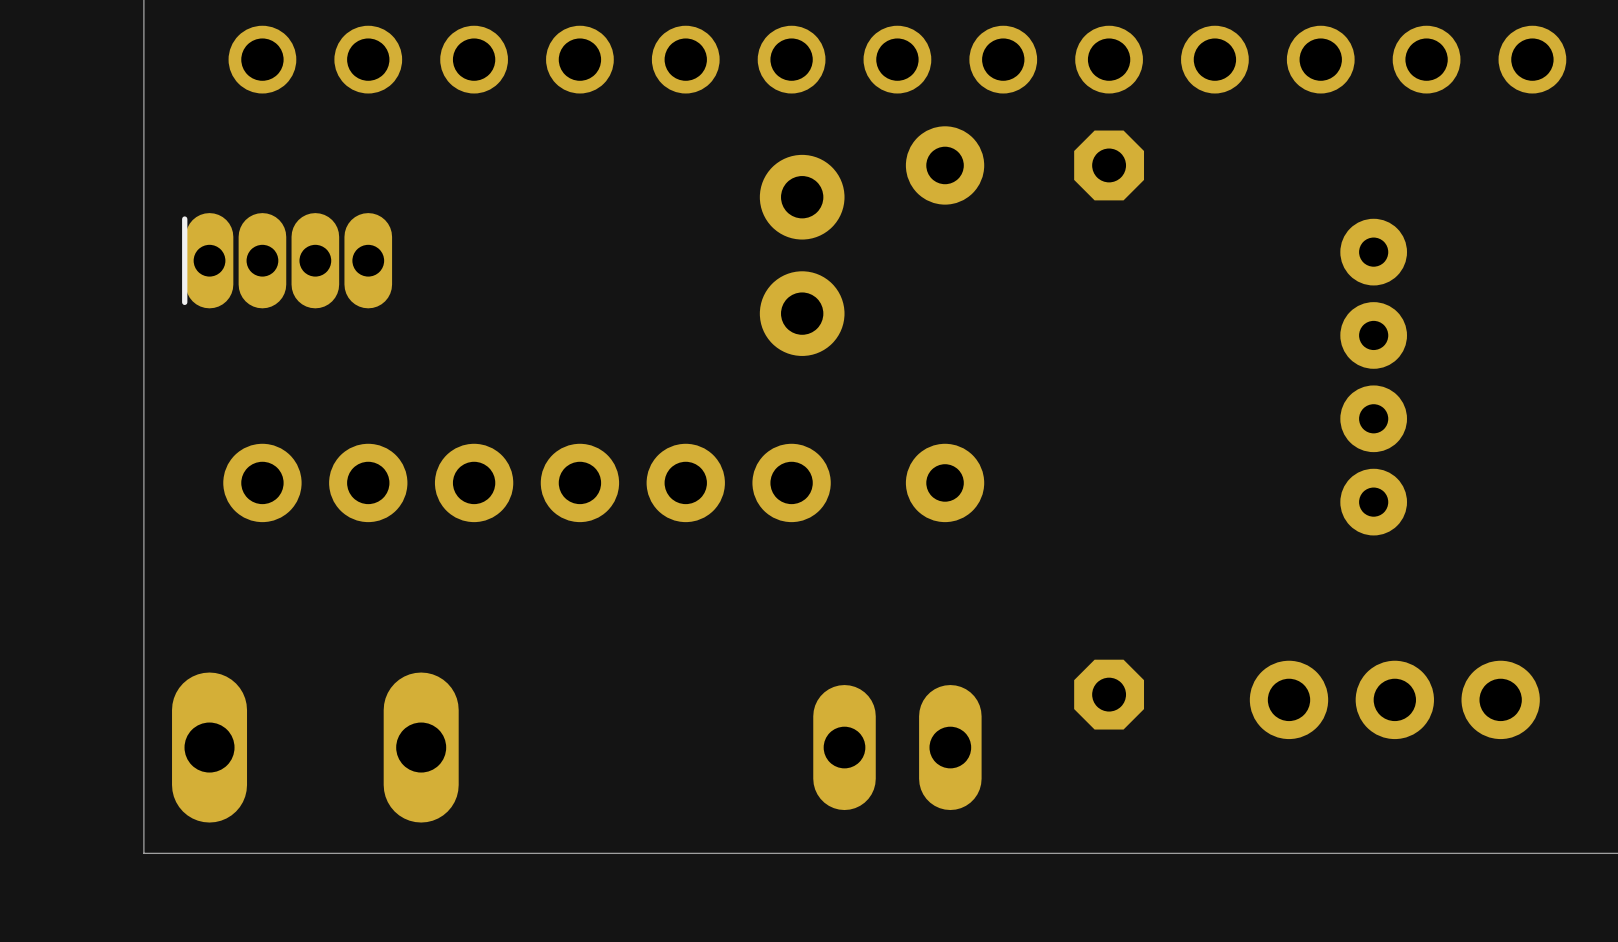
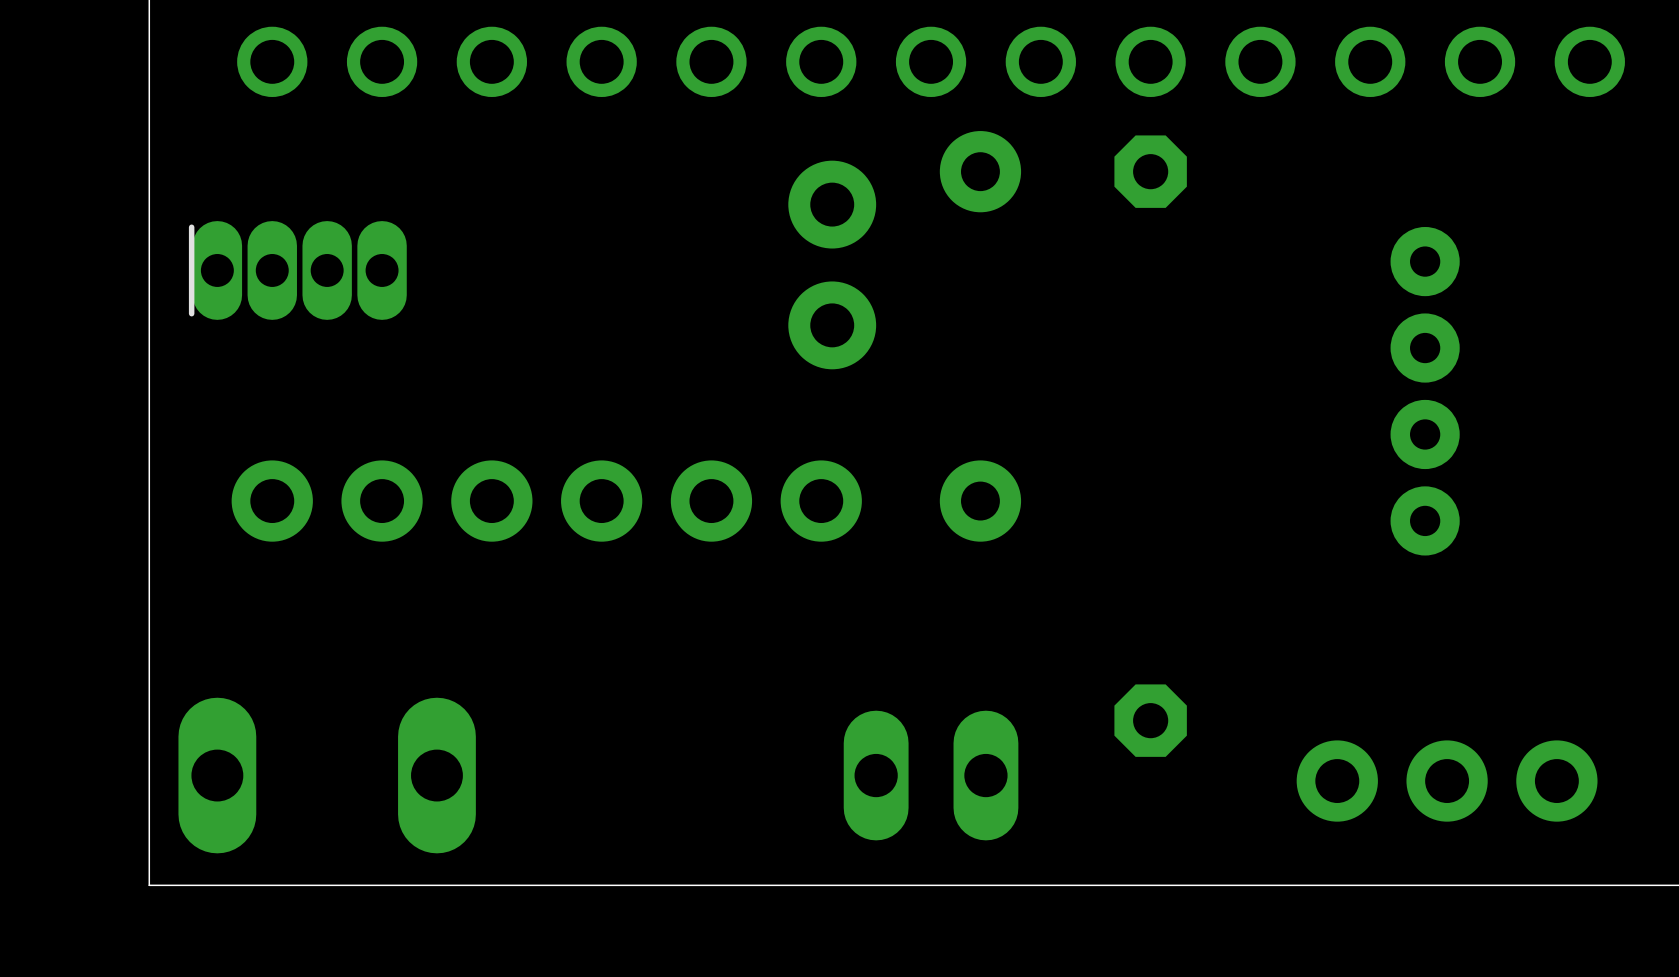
part position: (1394, 699) -> (1447, 781)

